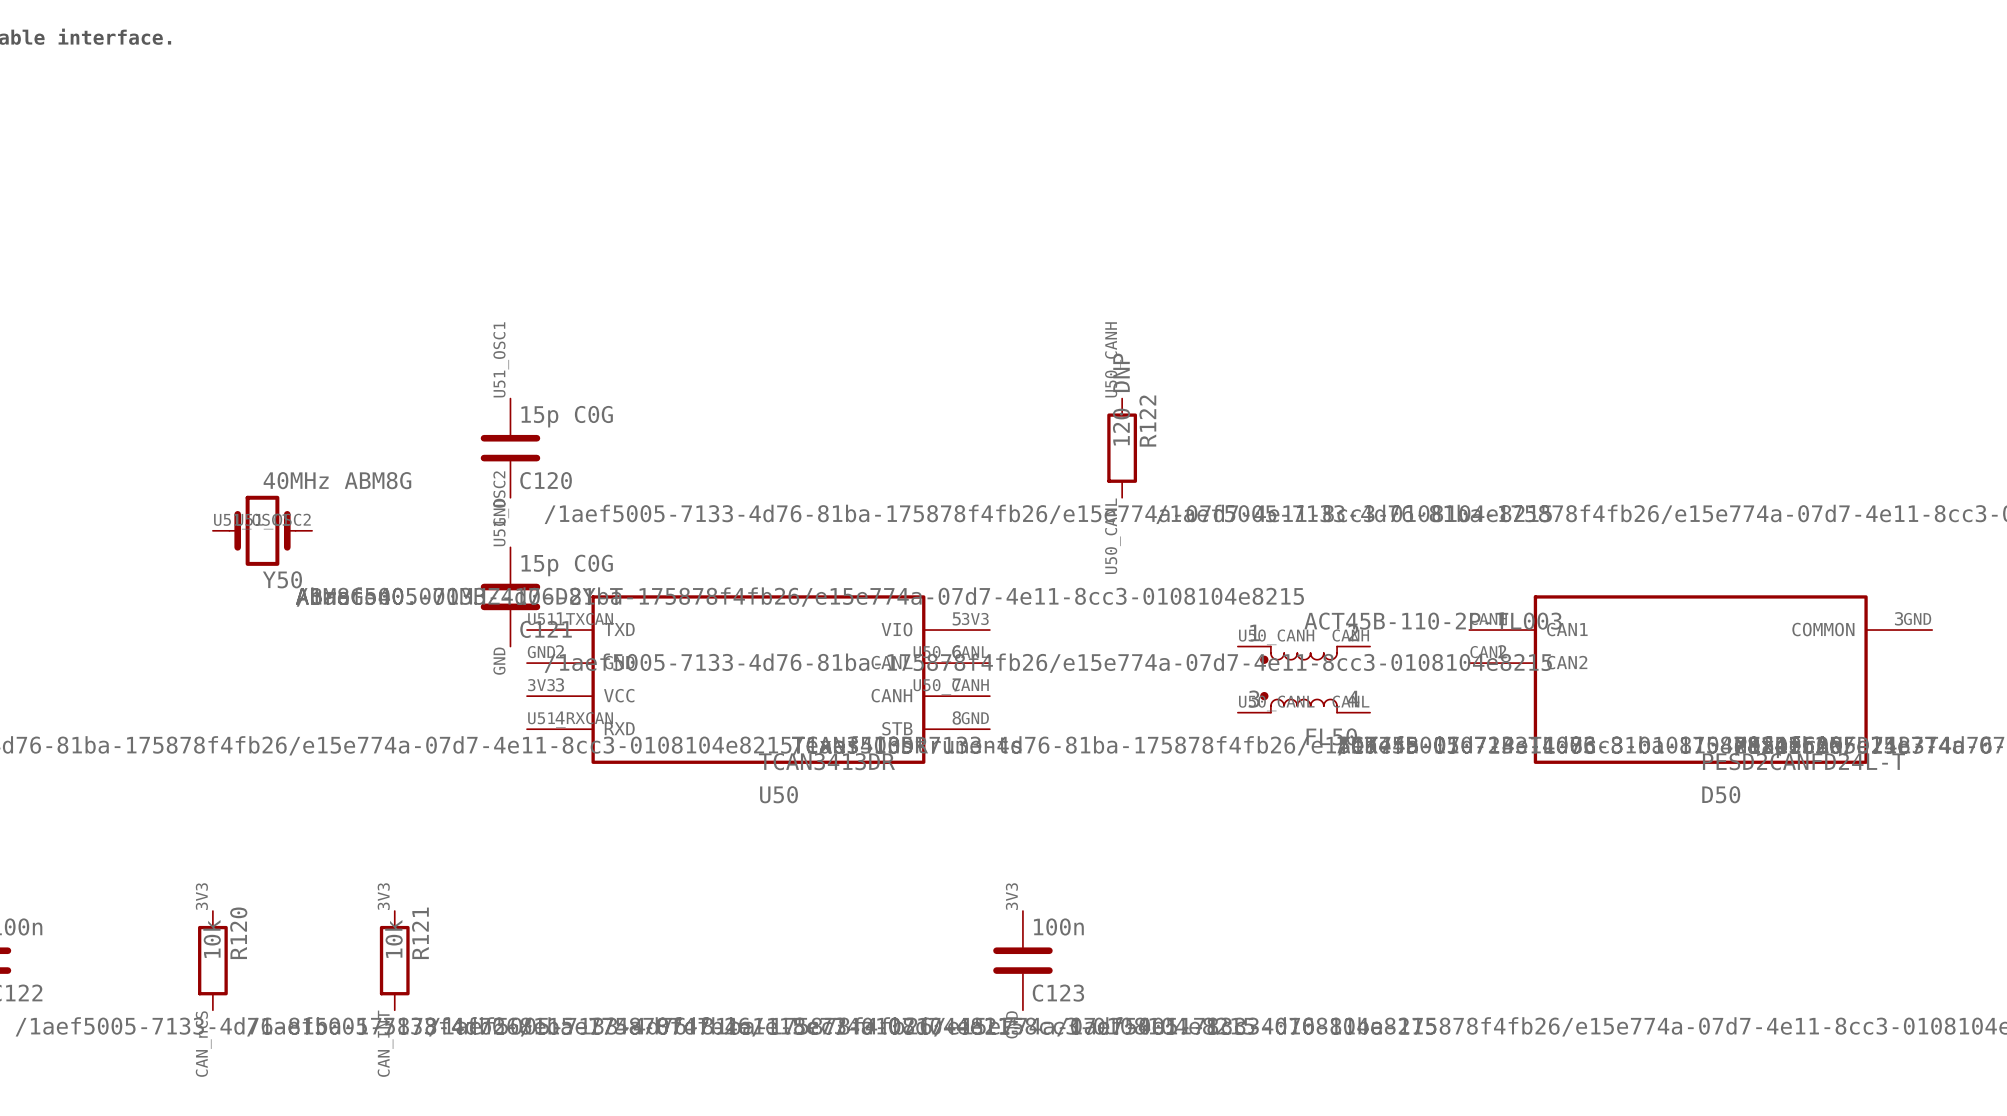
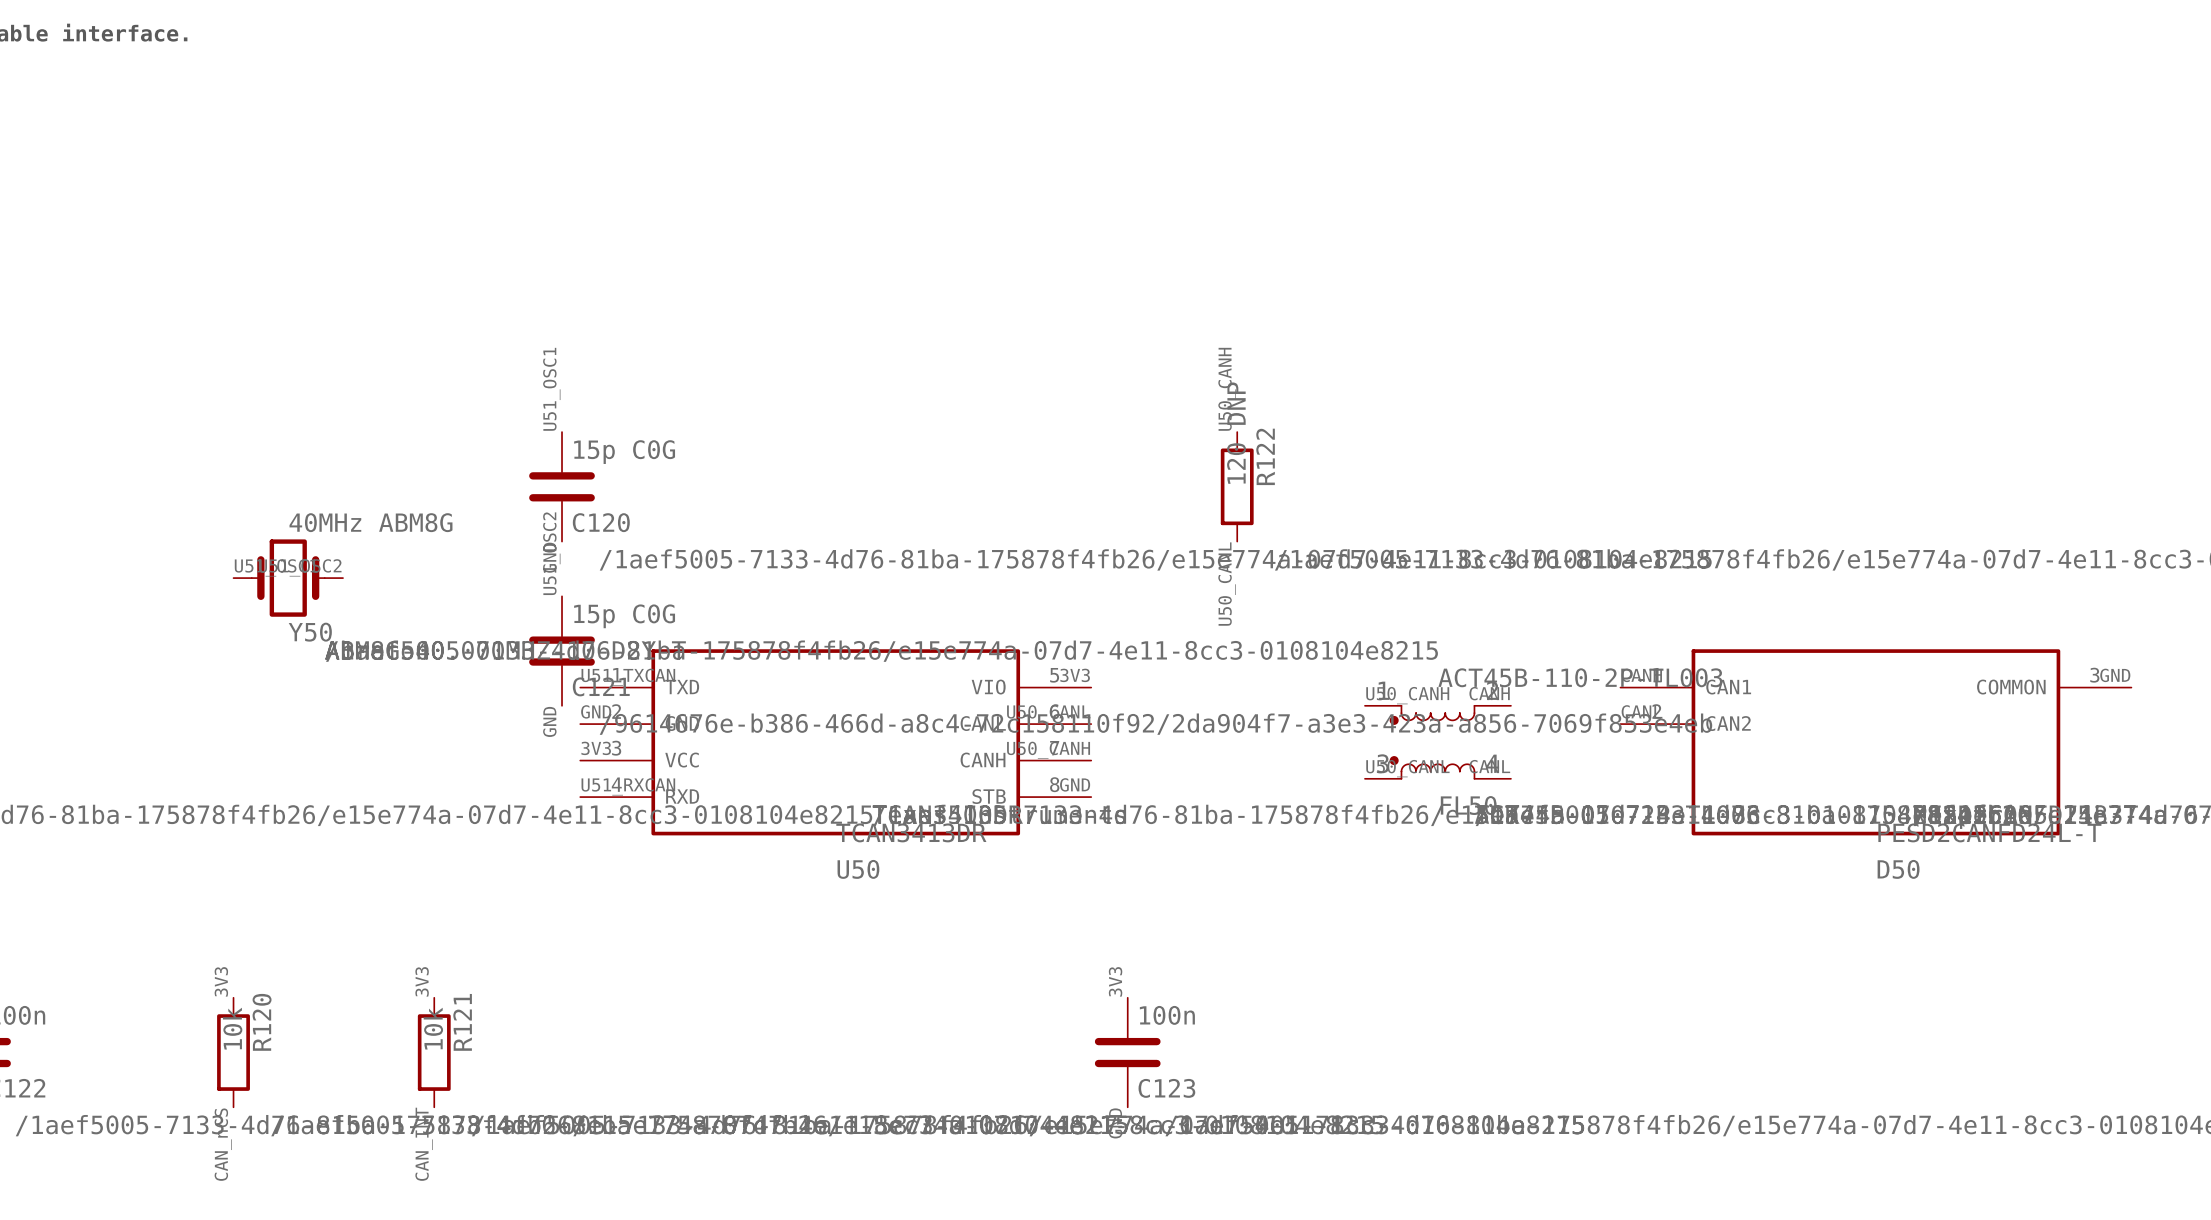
C121 text: /1aef5005-7133-4d76-81ba-175878f4fb26/e15e774a-07d7-4e11-8cc3-0108104e8215 (1048, 663) -> /9614676e-b386-466d-a8c4-72c158110f92/2da904f7-a3e3-423a-a856-7069f853e4eb (1155, 724)

